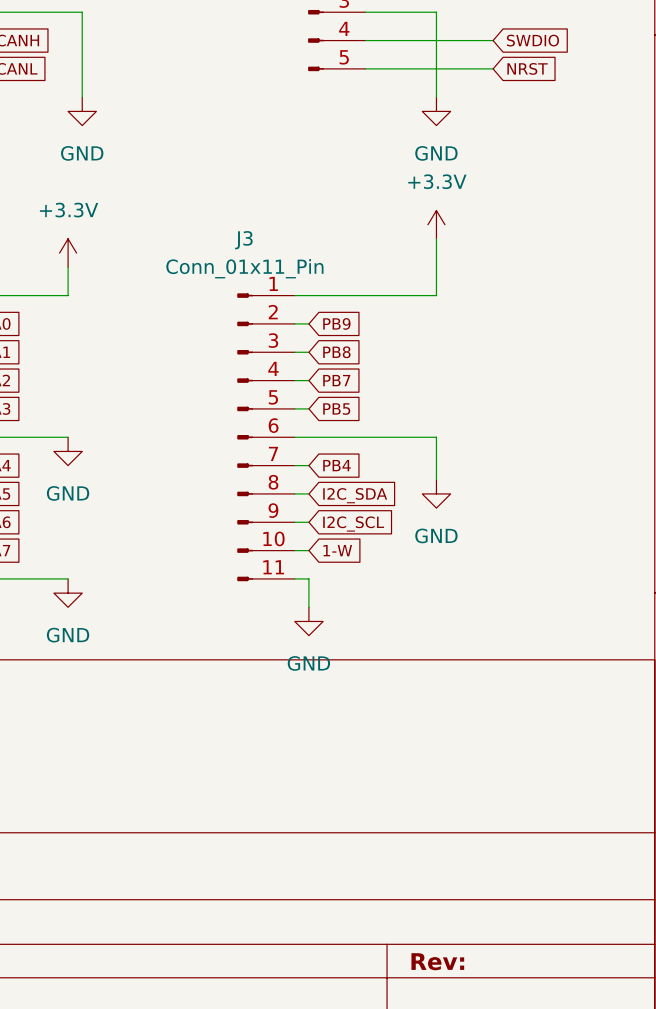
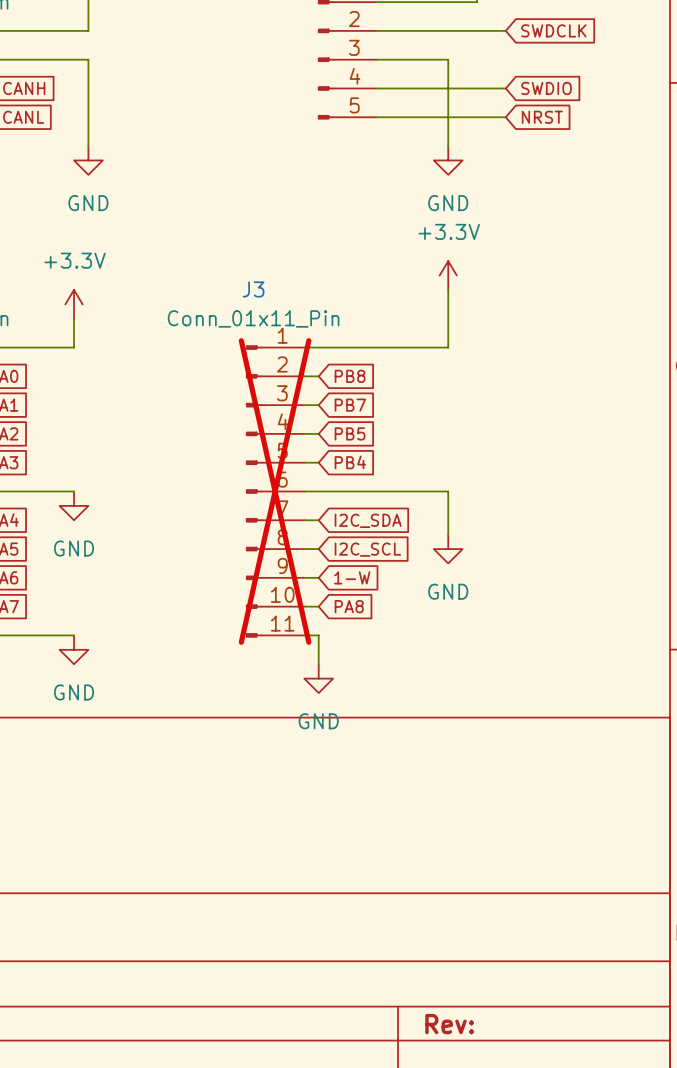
global label: PB9 (336, 323) -> PB8 (350, 376)
global label: PB8 (336, 352) -> PB7 (350, 405)
global label: PB7 (336, 380) -> PB5 (350, 433)
global label: PB5 (336, 409) -> PB4 (350, 462)
J3 do-not-place cross: none -> (275, 491)
global label: PB4 (336, 465) -> I2C_SDA (368, 520)
global label: I2C_SDA (355, 495) -> I2C_SCL (367, 549)
global label: I2C_SCL (353, 524) -> 1-W (352, 577)
global label: 1-W (337, 550) -> PA8 (349, 606)

